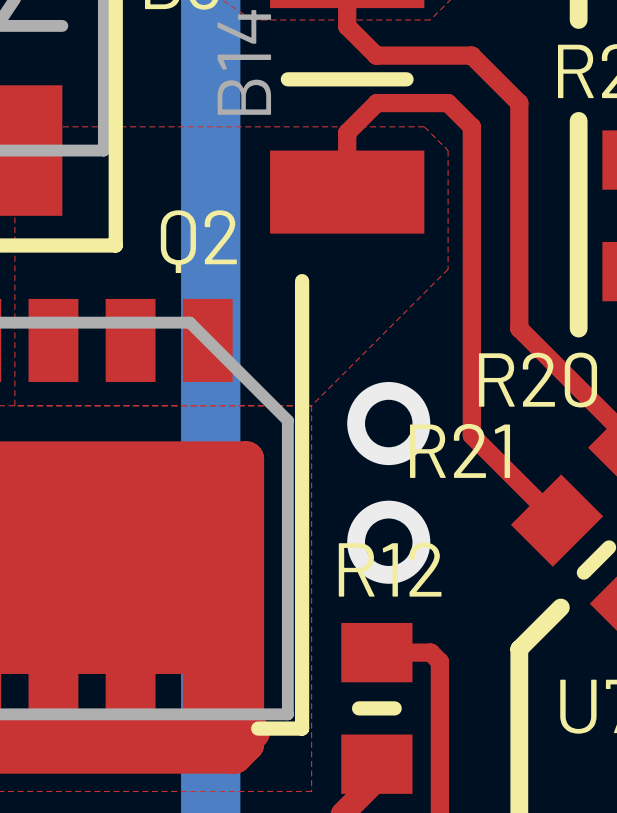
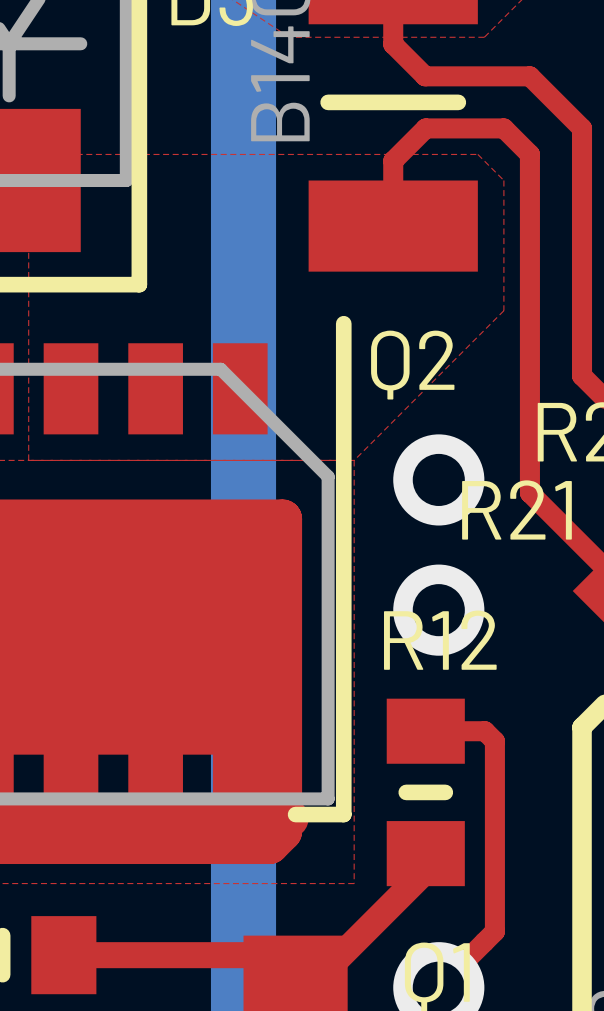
Q2 name position: Q2 (198, 241) -> Q2 (412, 365)

